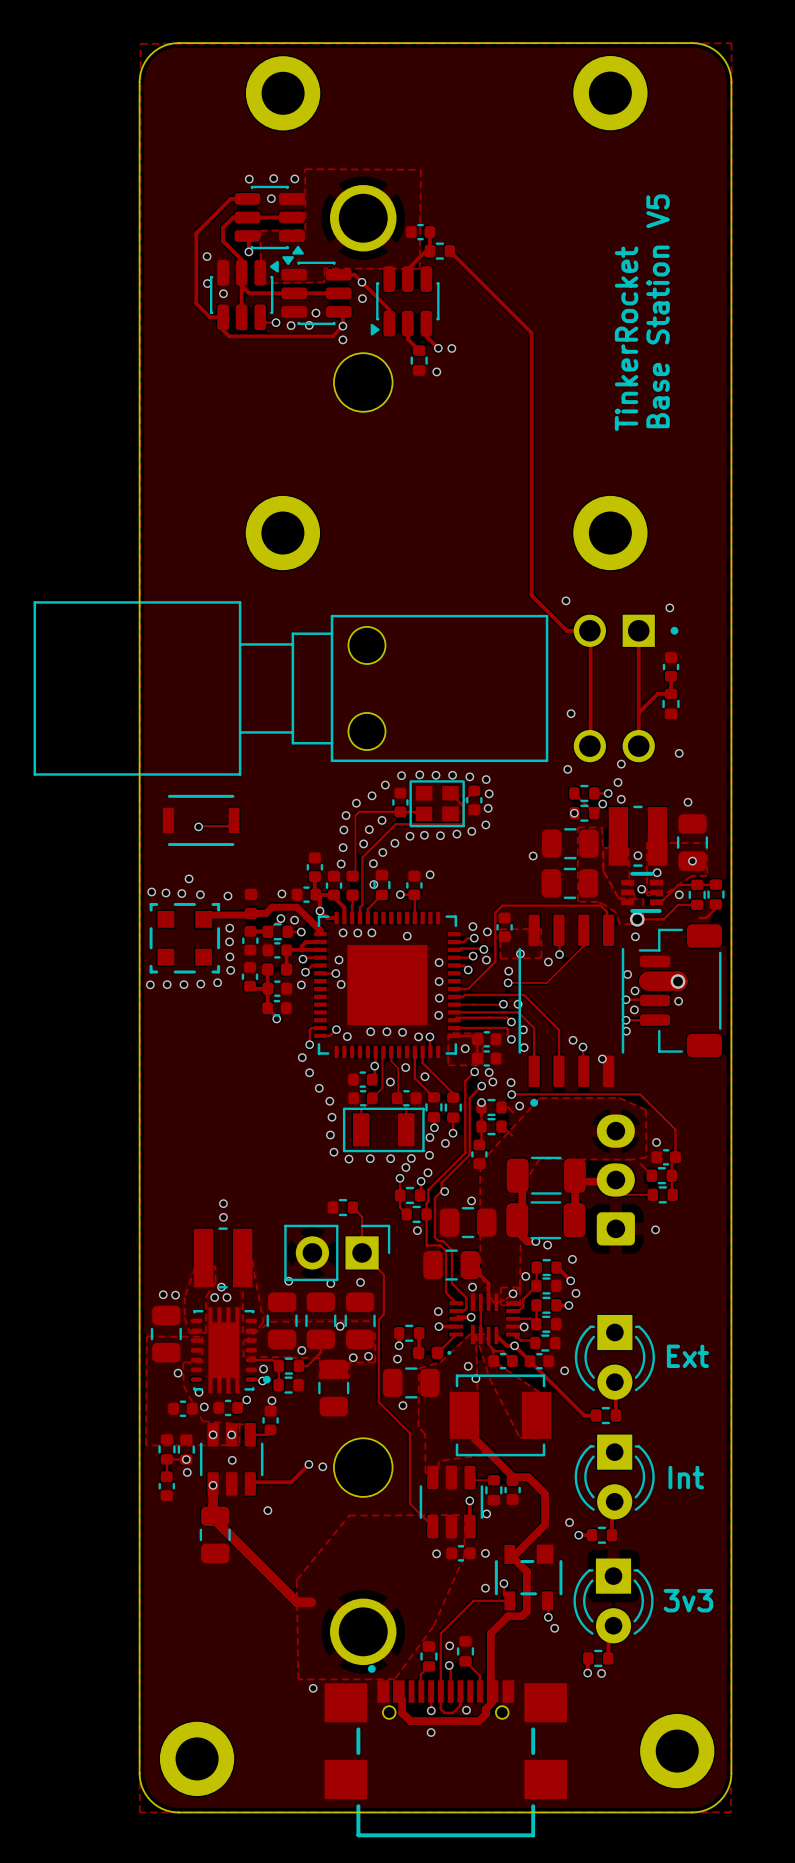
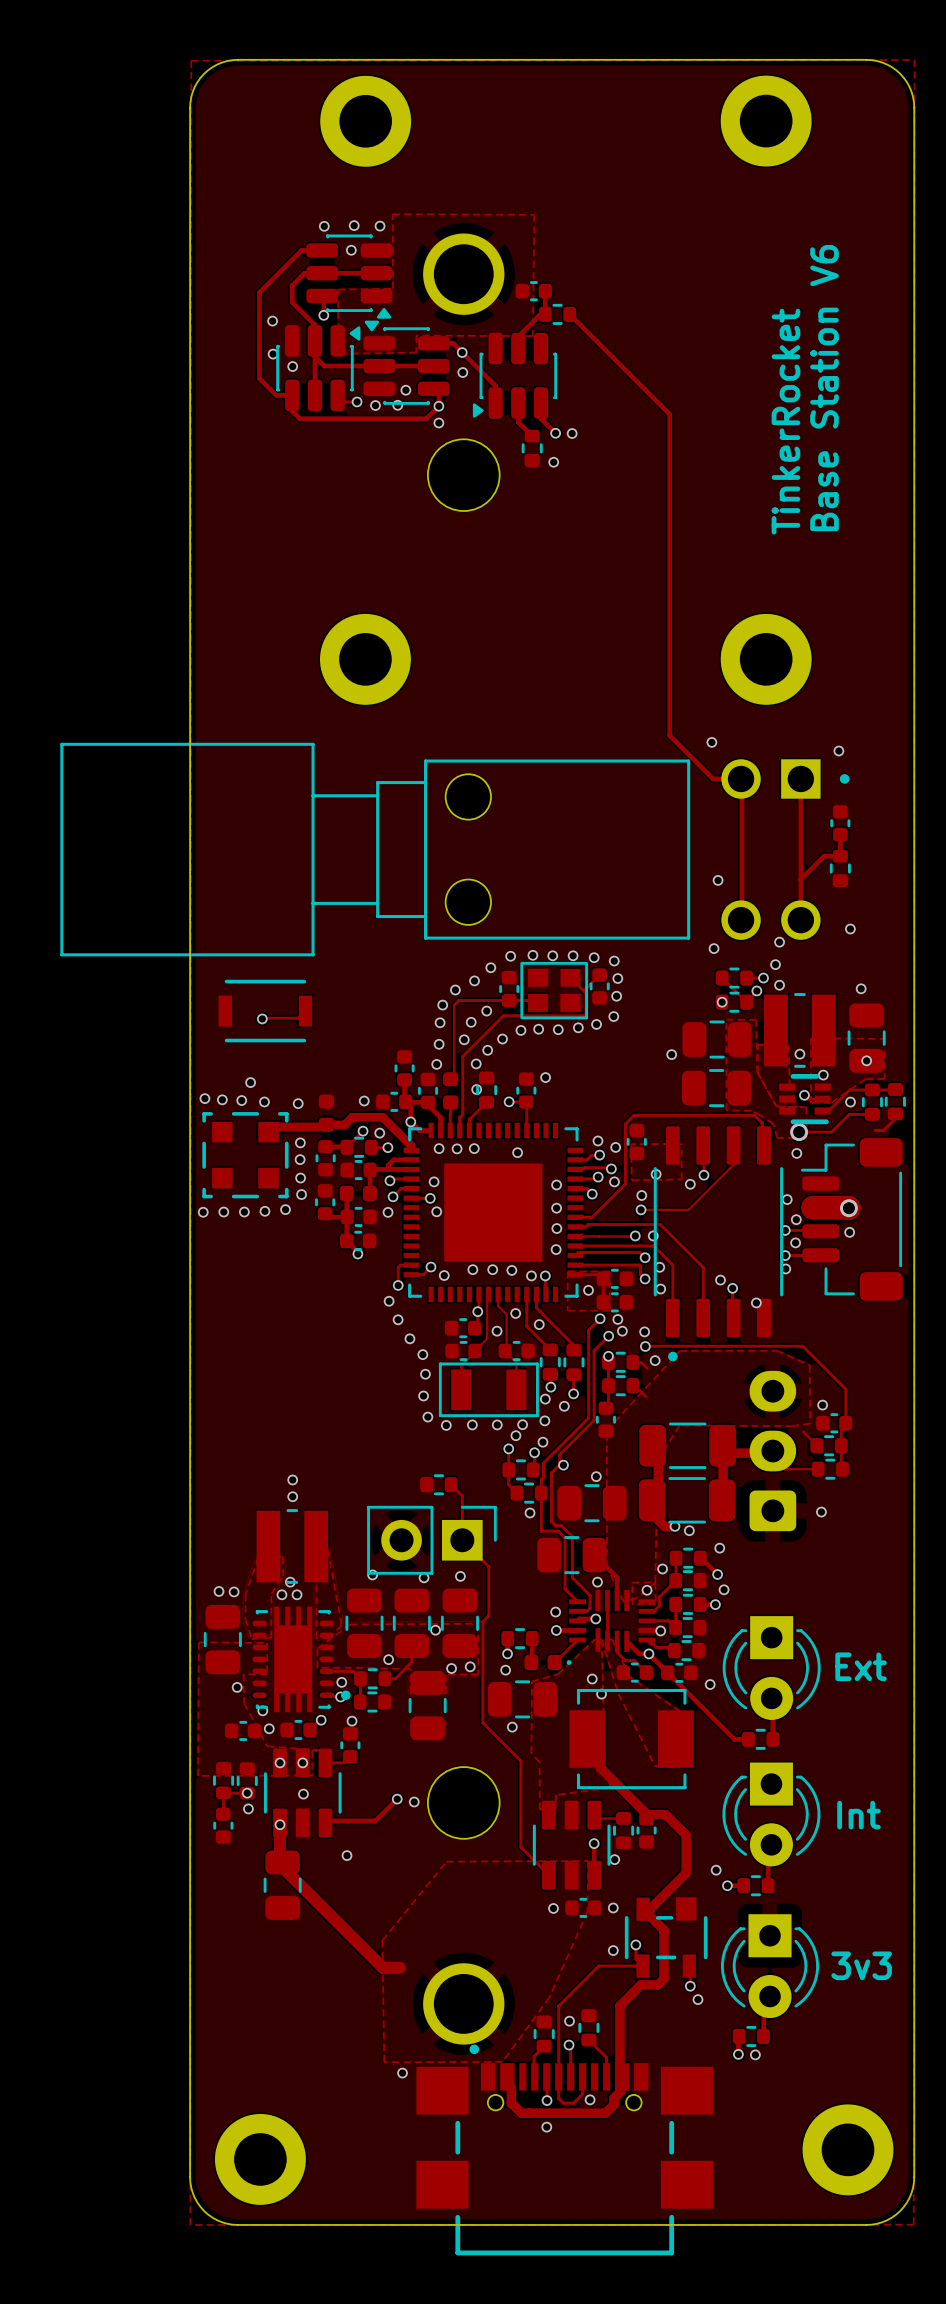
text: Base Station V5 (658, 311) -> Base Station V6 (824, 388)

